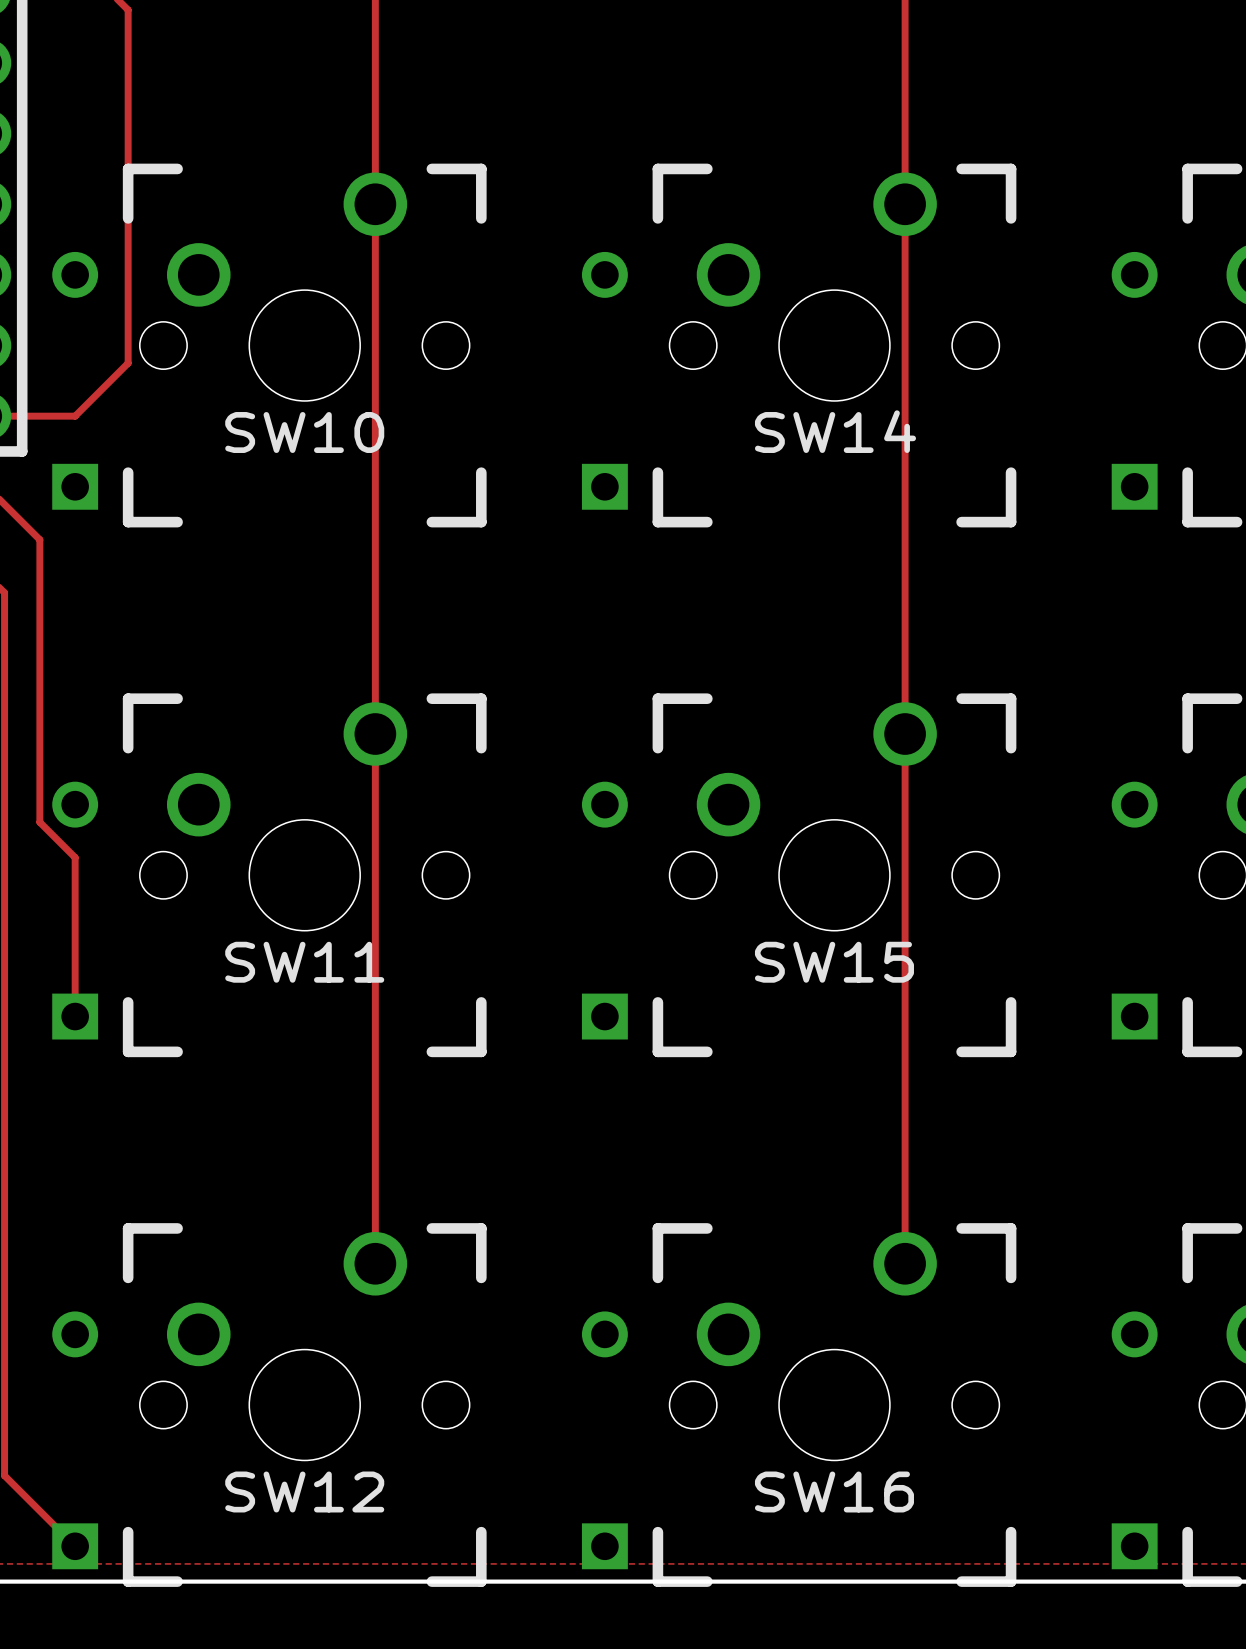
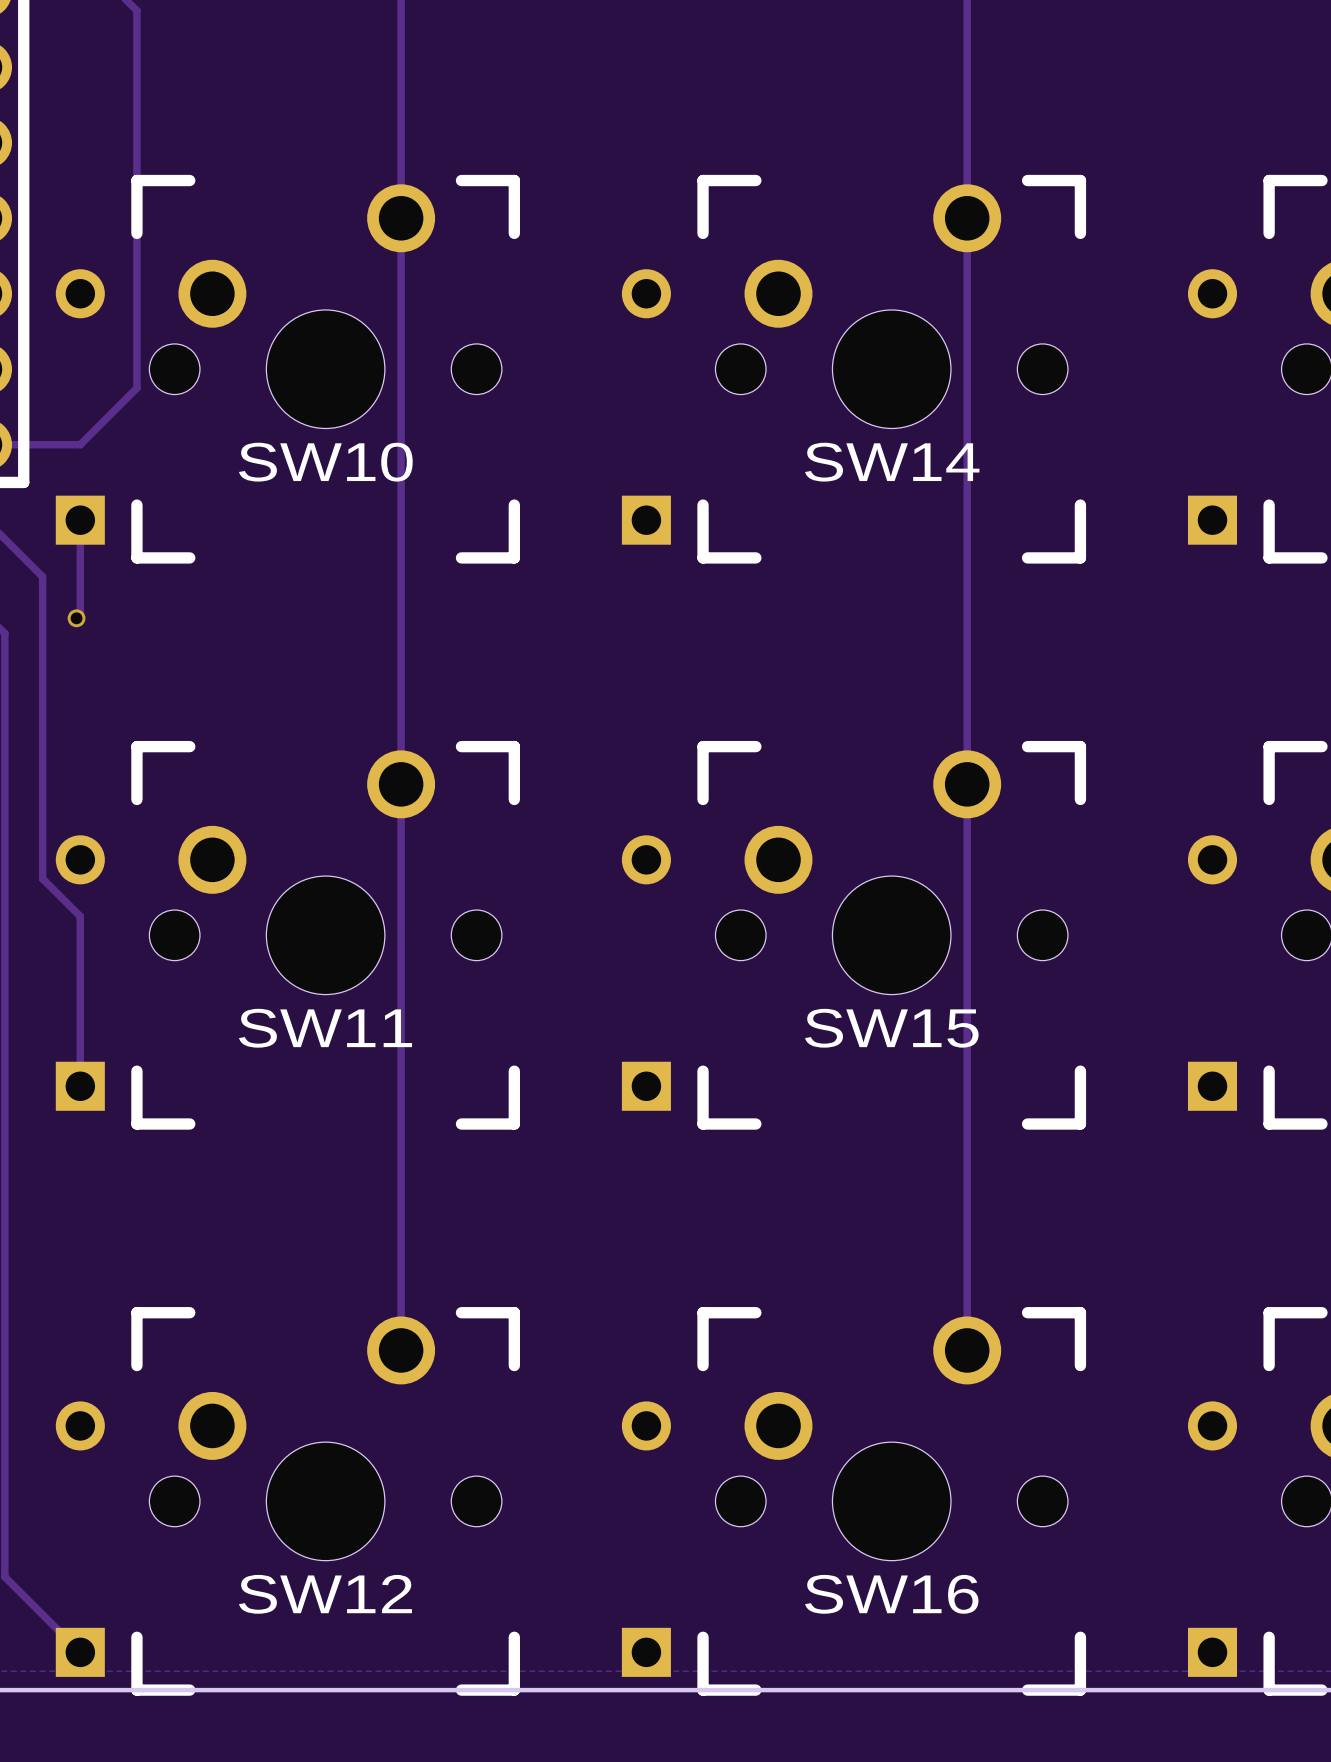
track: none -> (80, 520) (80, 614) (76, 618)
via: none -> (76, 618)

